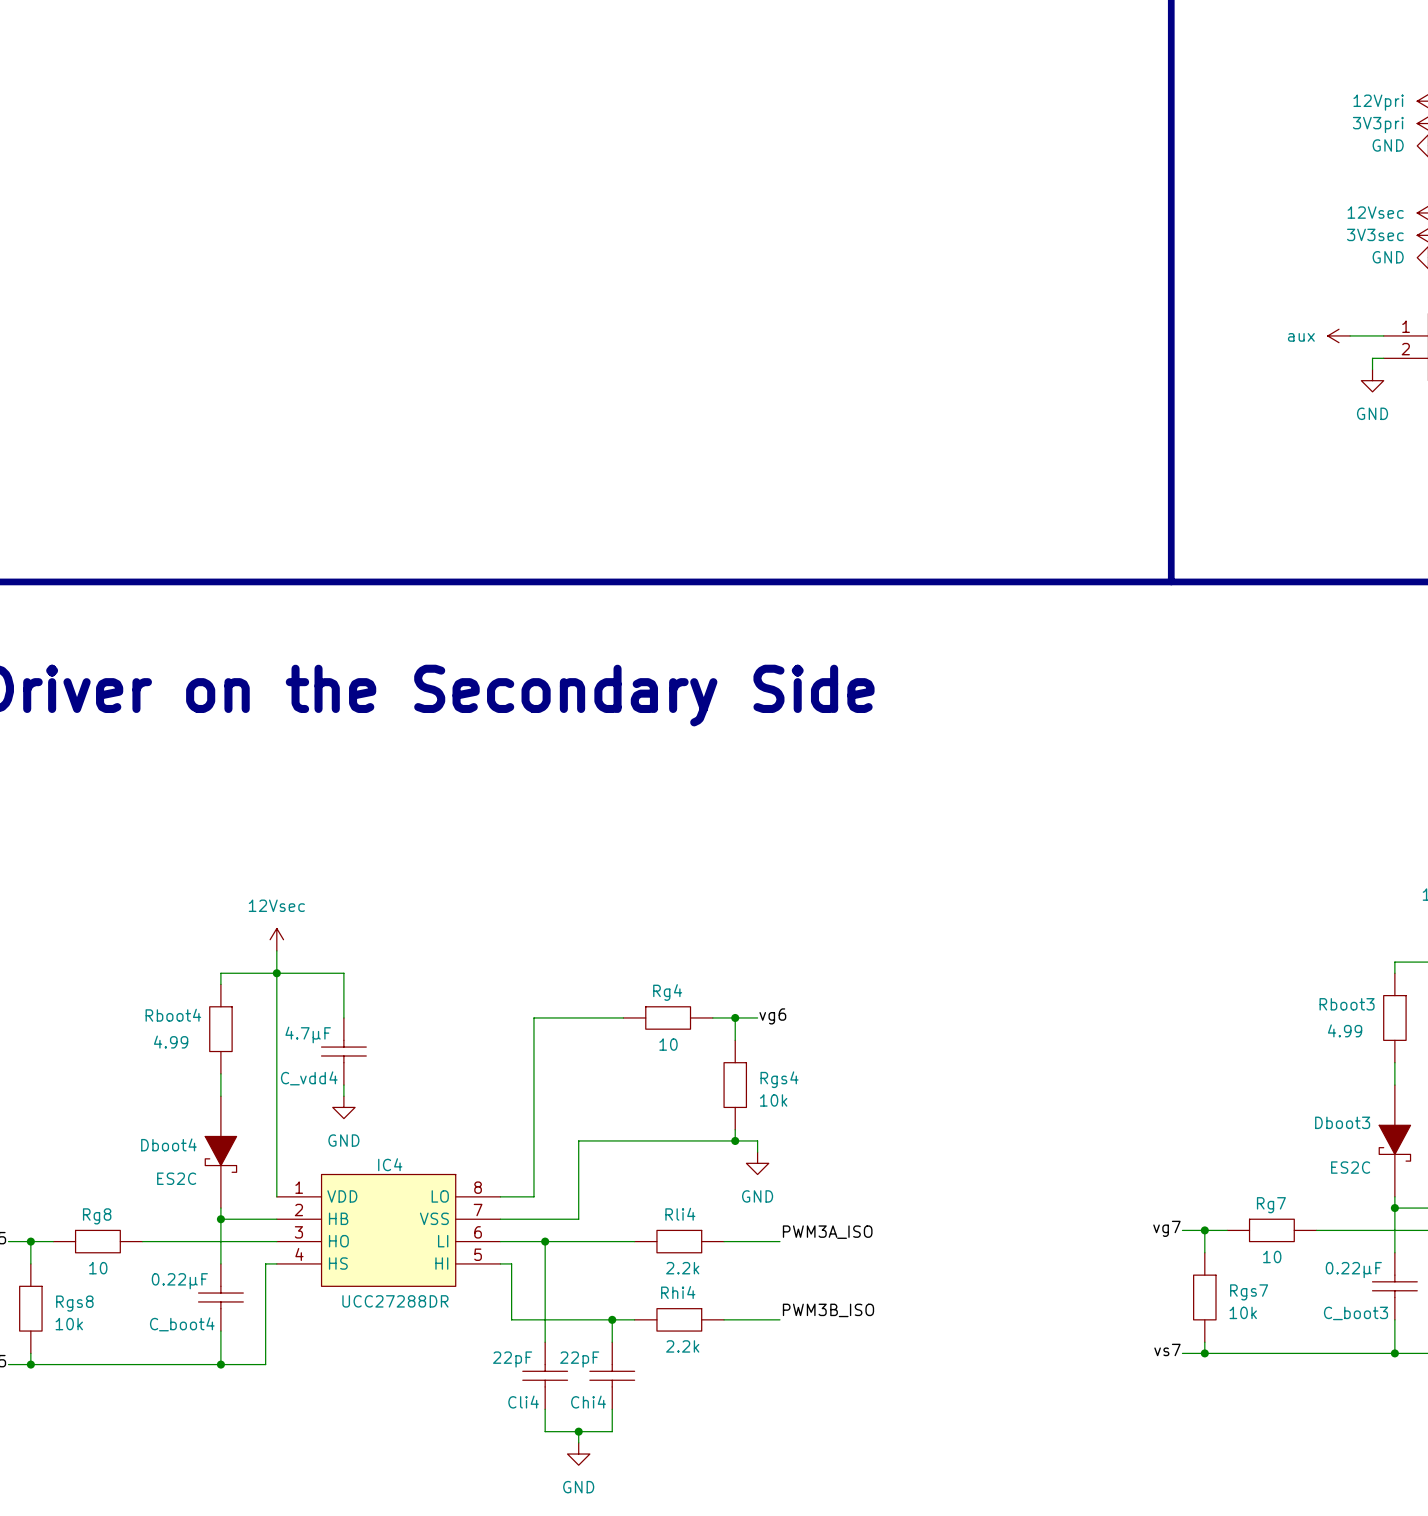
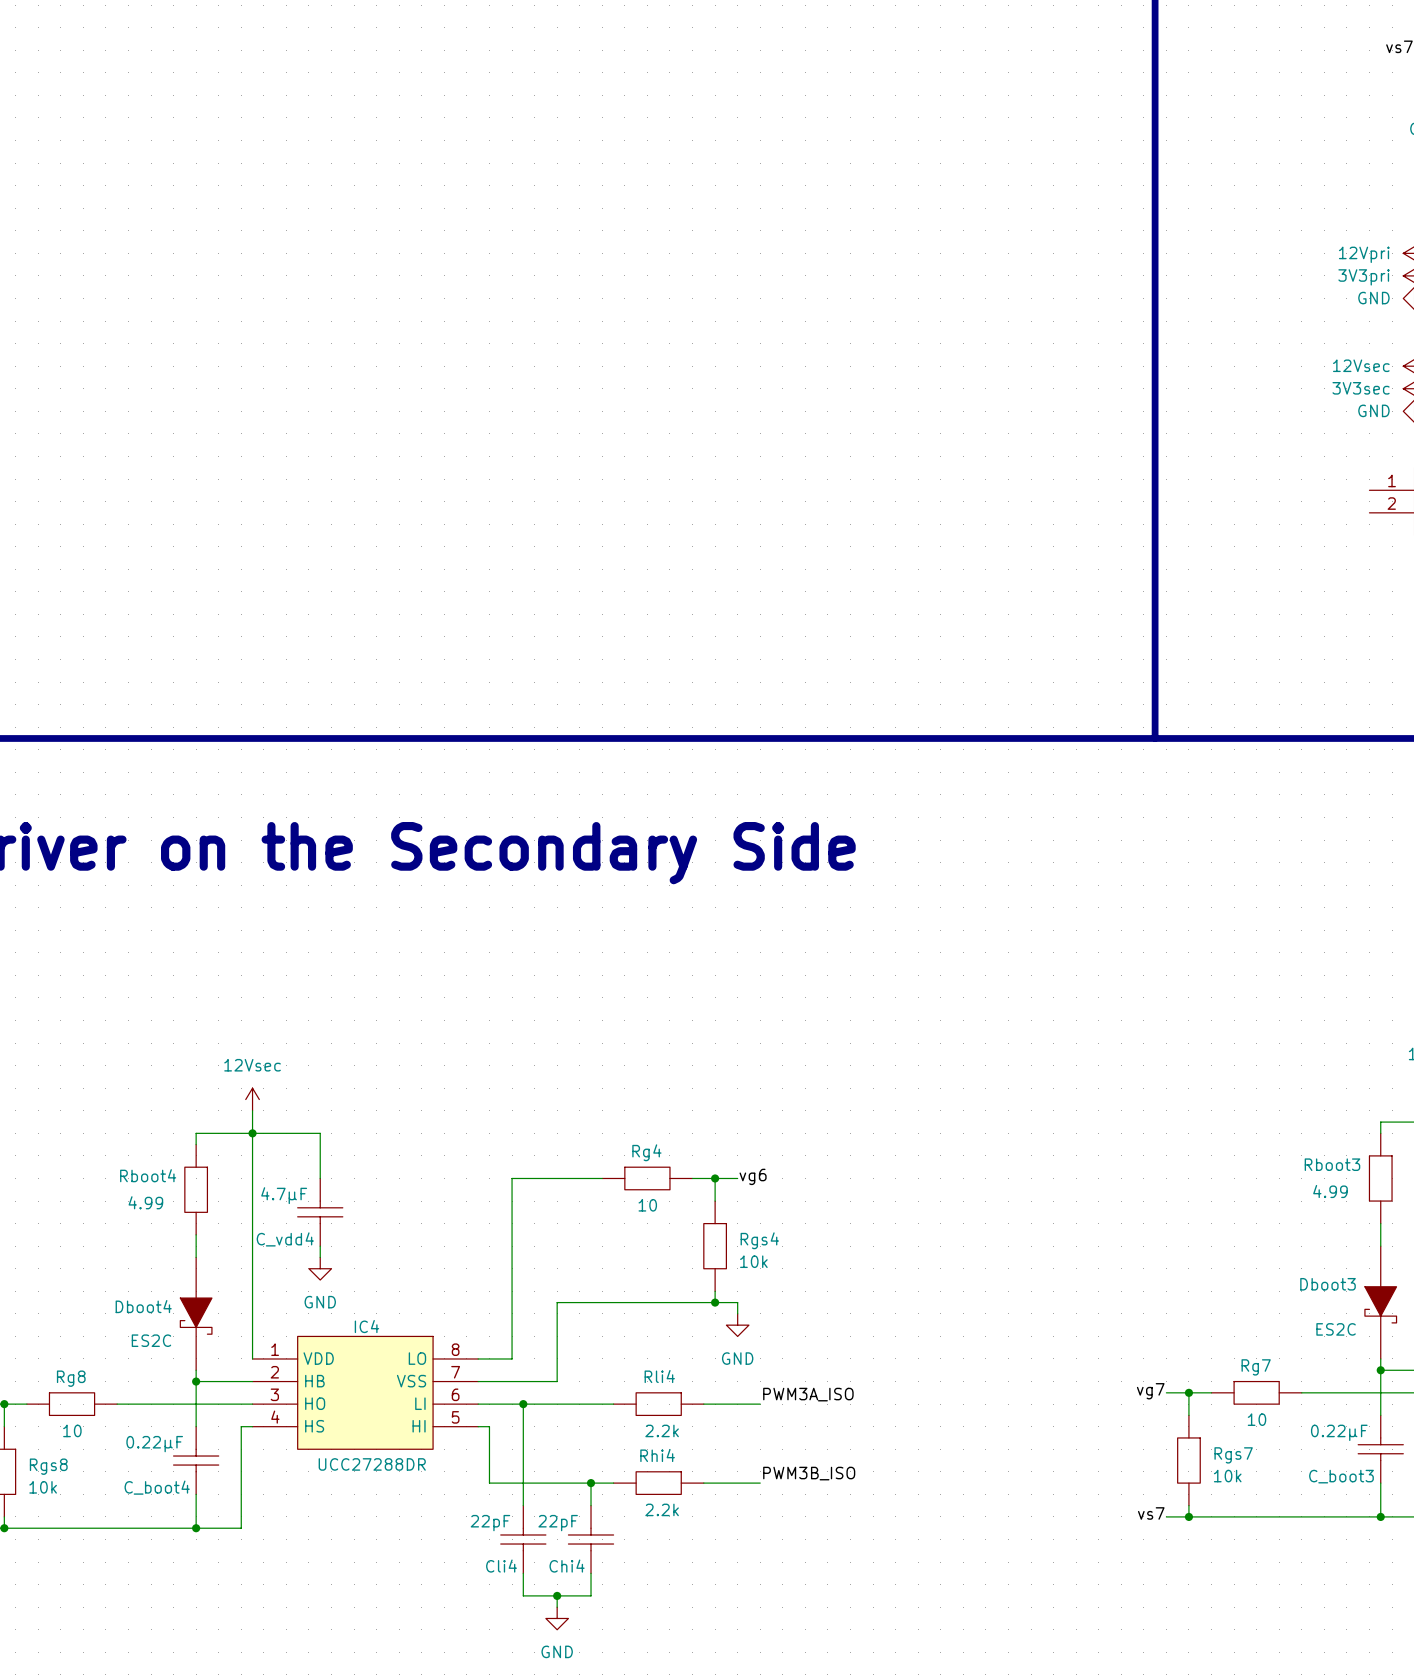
power symbol: aux (1338, 335) -> none
wire: (1350, 335) (1383, 335) -> none
wire: (1383, 358) (1372, 358) (1372, 369) -> none
power symbol: GND (1372, 380) -> none

